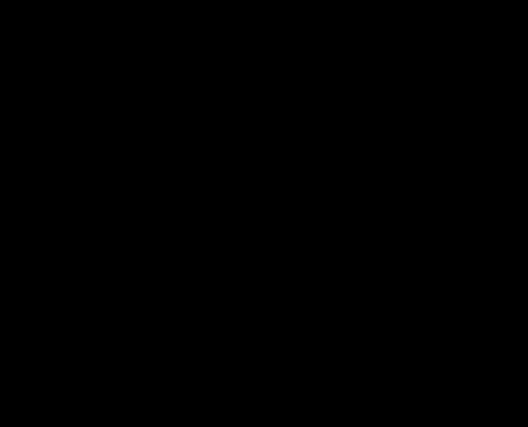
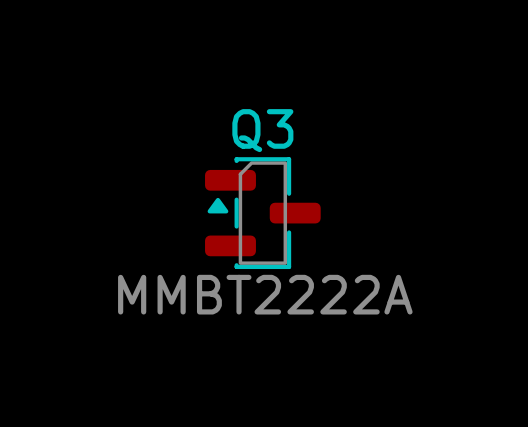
Q3: none -> MMBT2222A (262, 213)

